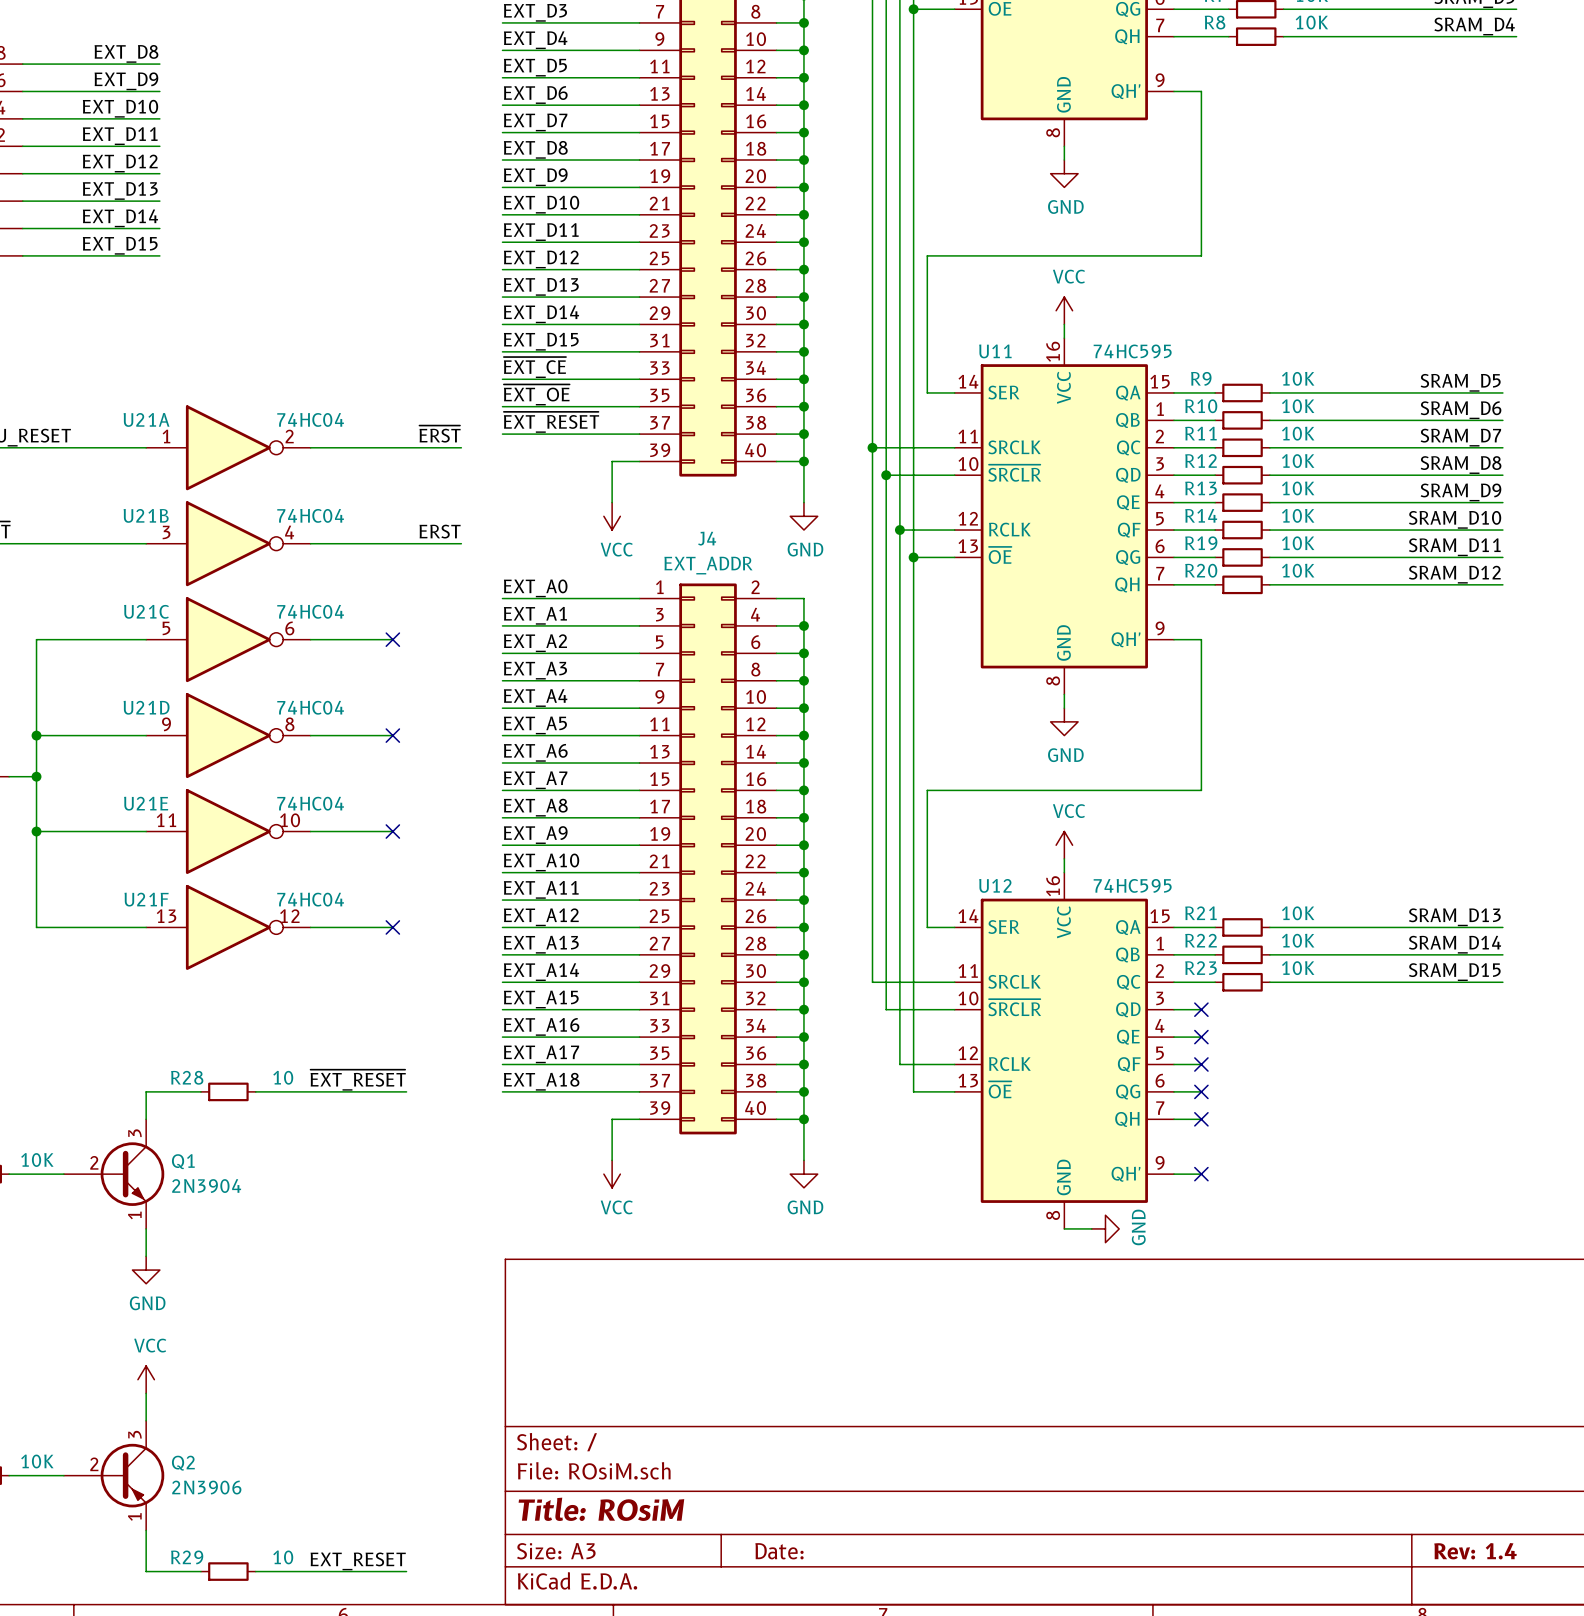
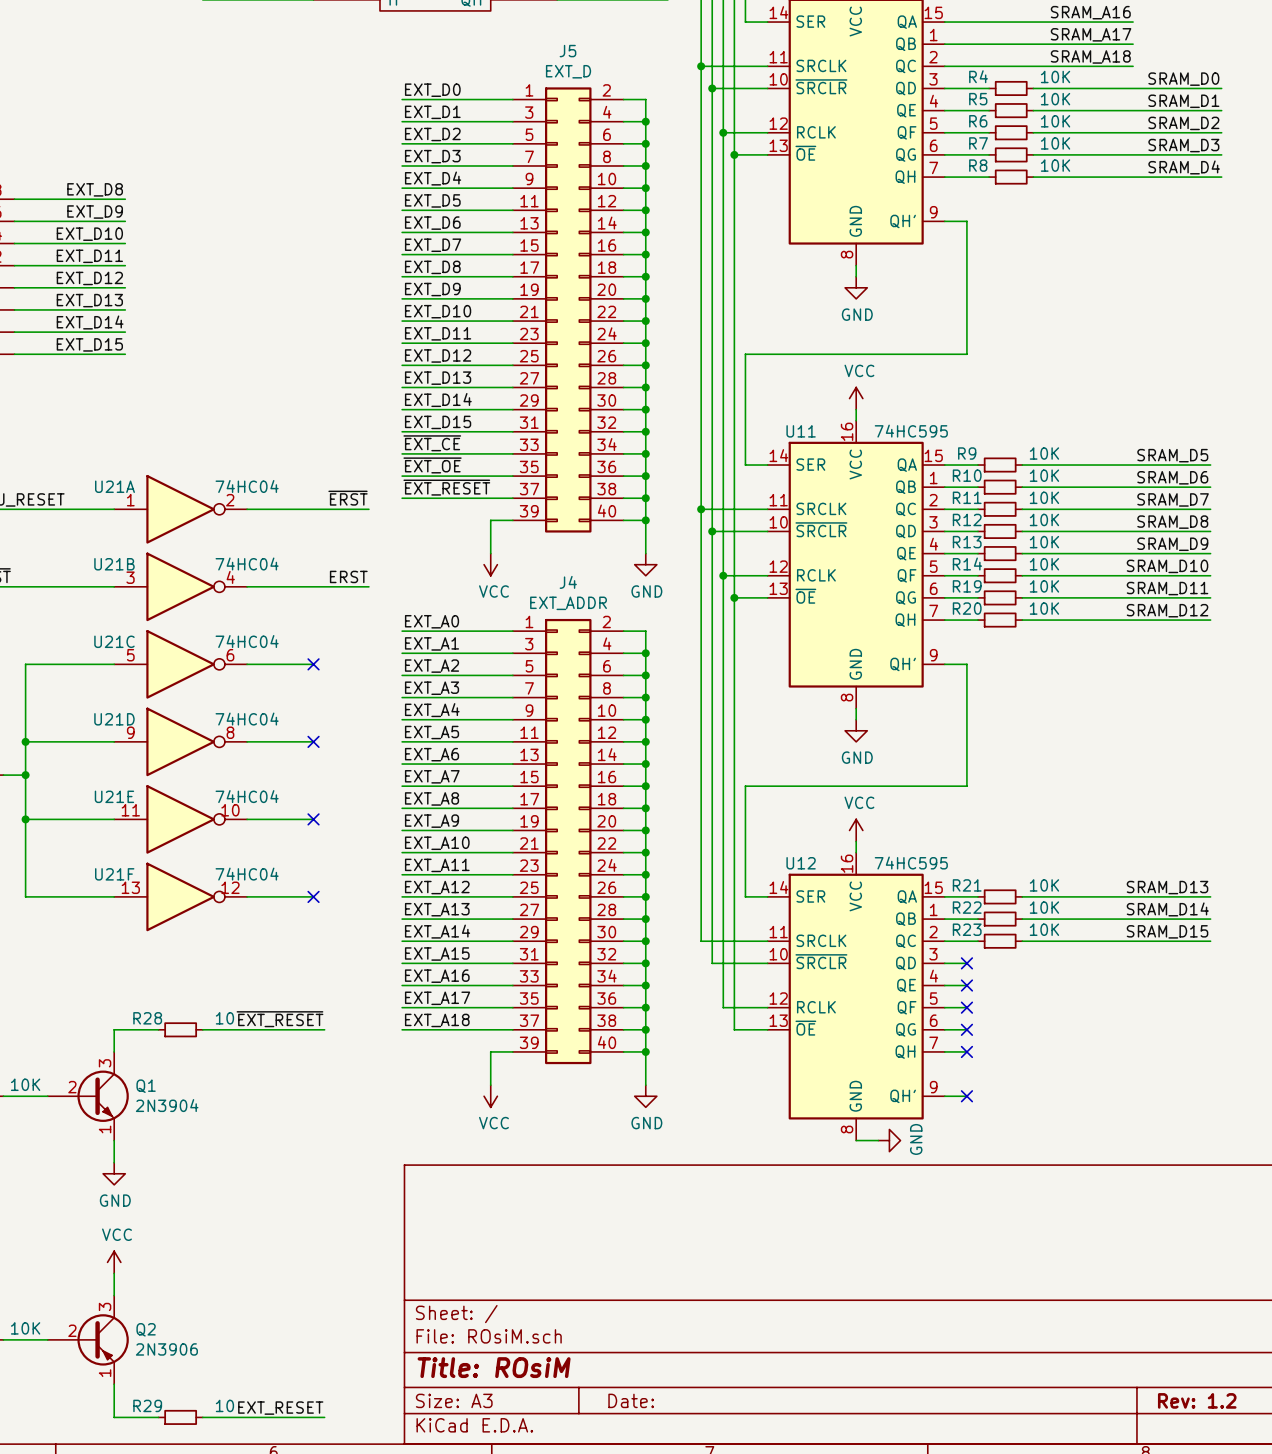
title block: Rev: 1.4 (1475, 1551) -> Rev: 1.2 (1197, 1400)

